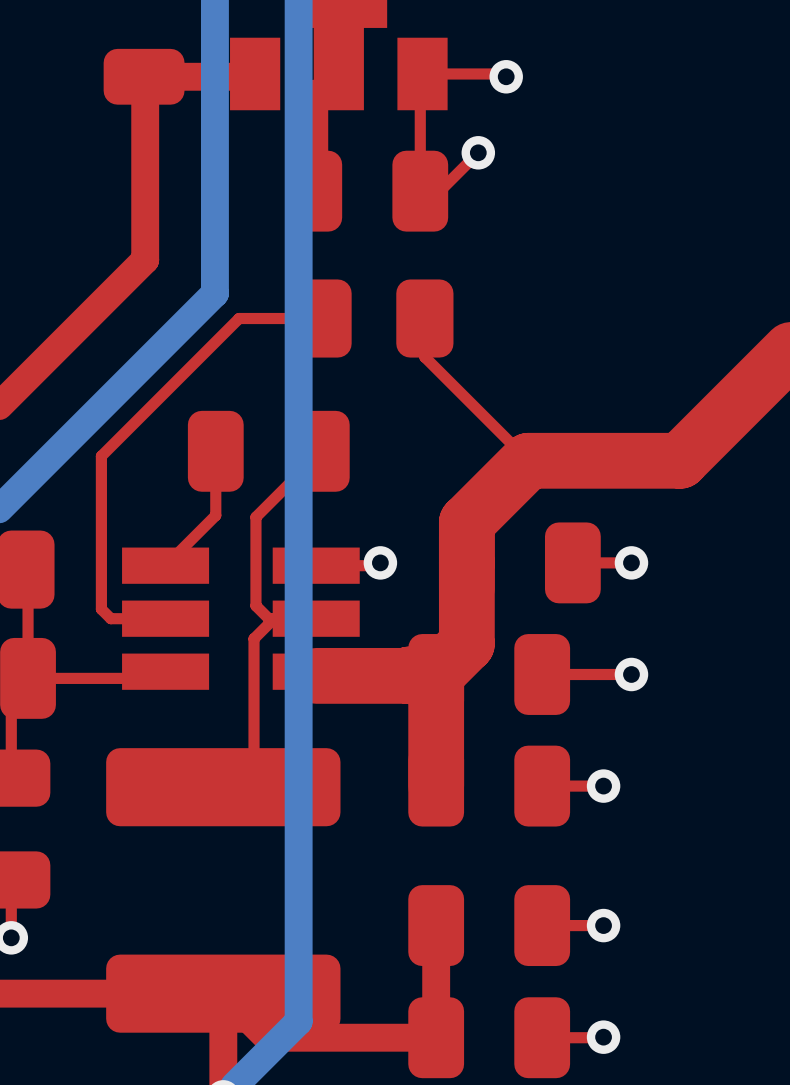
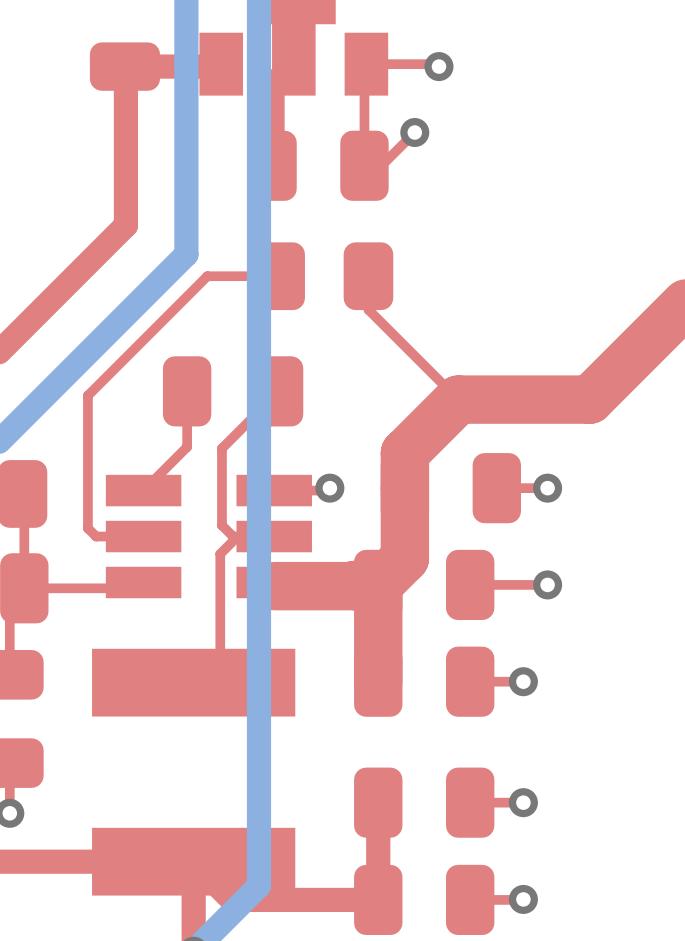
part footprint: [106, 748, 341, 1033] -> [92, 648, 296, 896]

